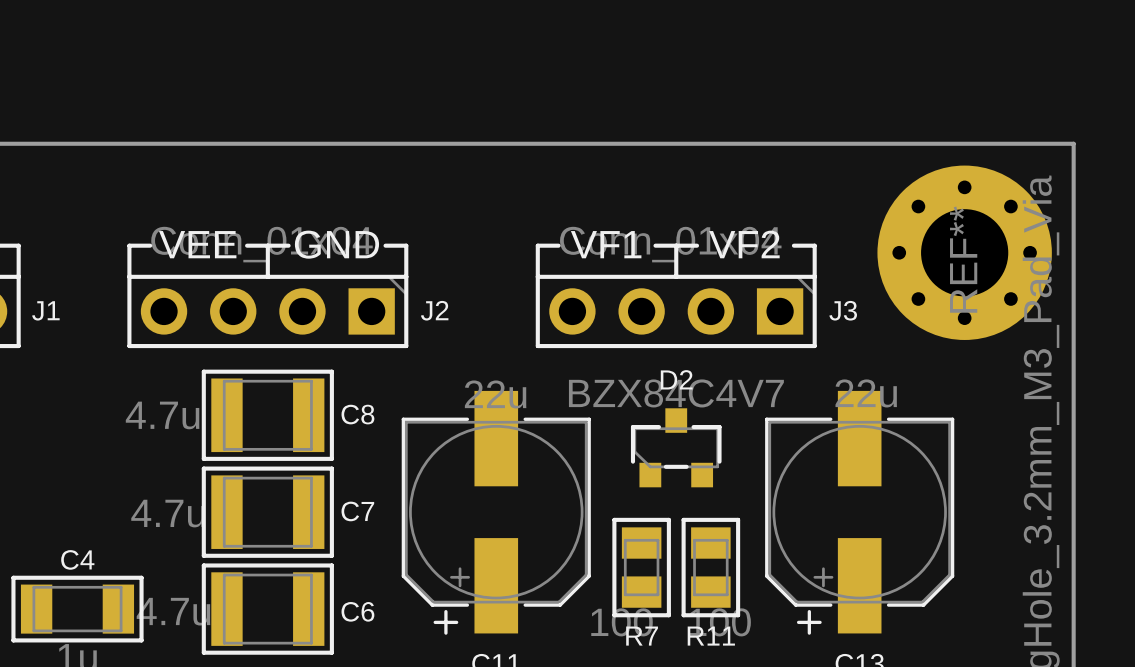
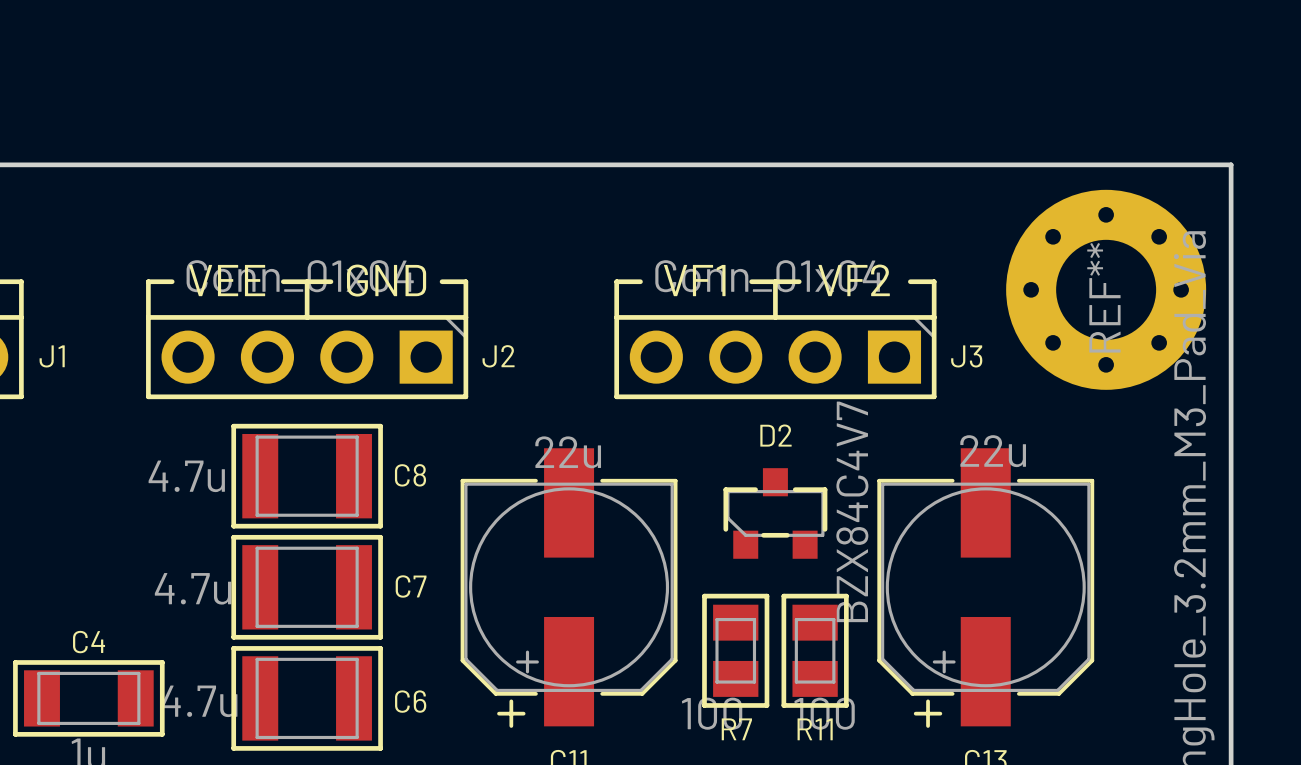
D2 value rotation: 0° (676, 393) -> 90° counterclockwise (852, 511)

